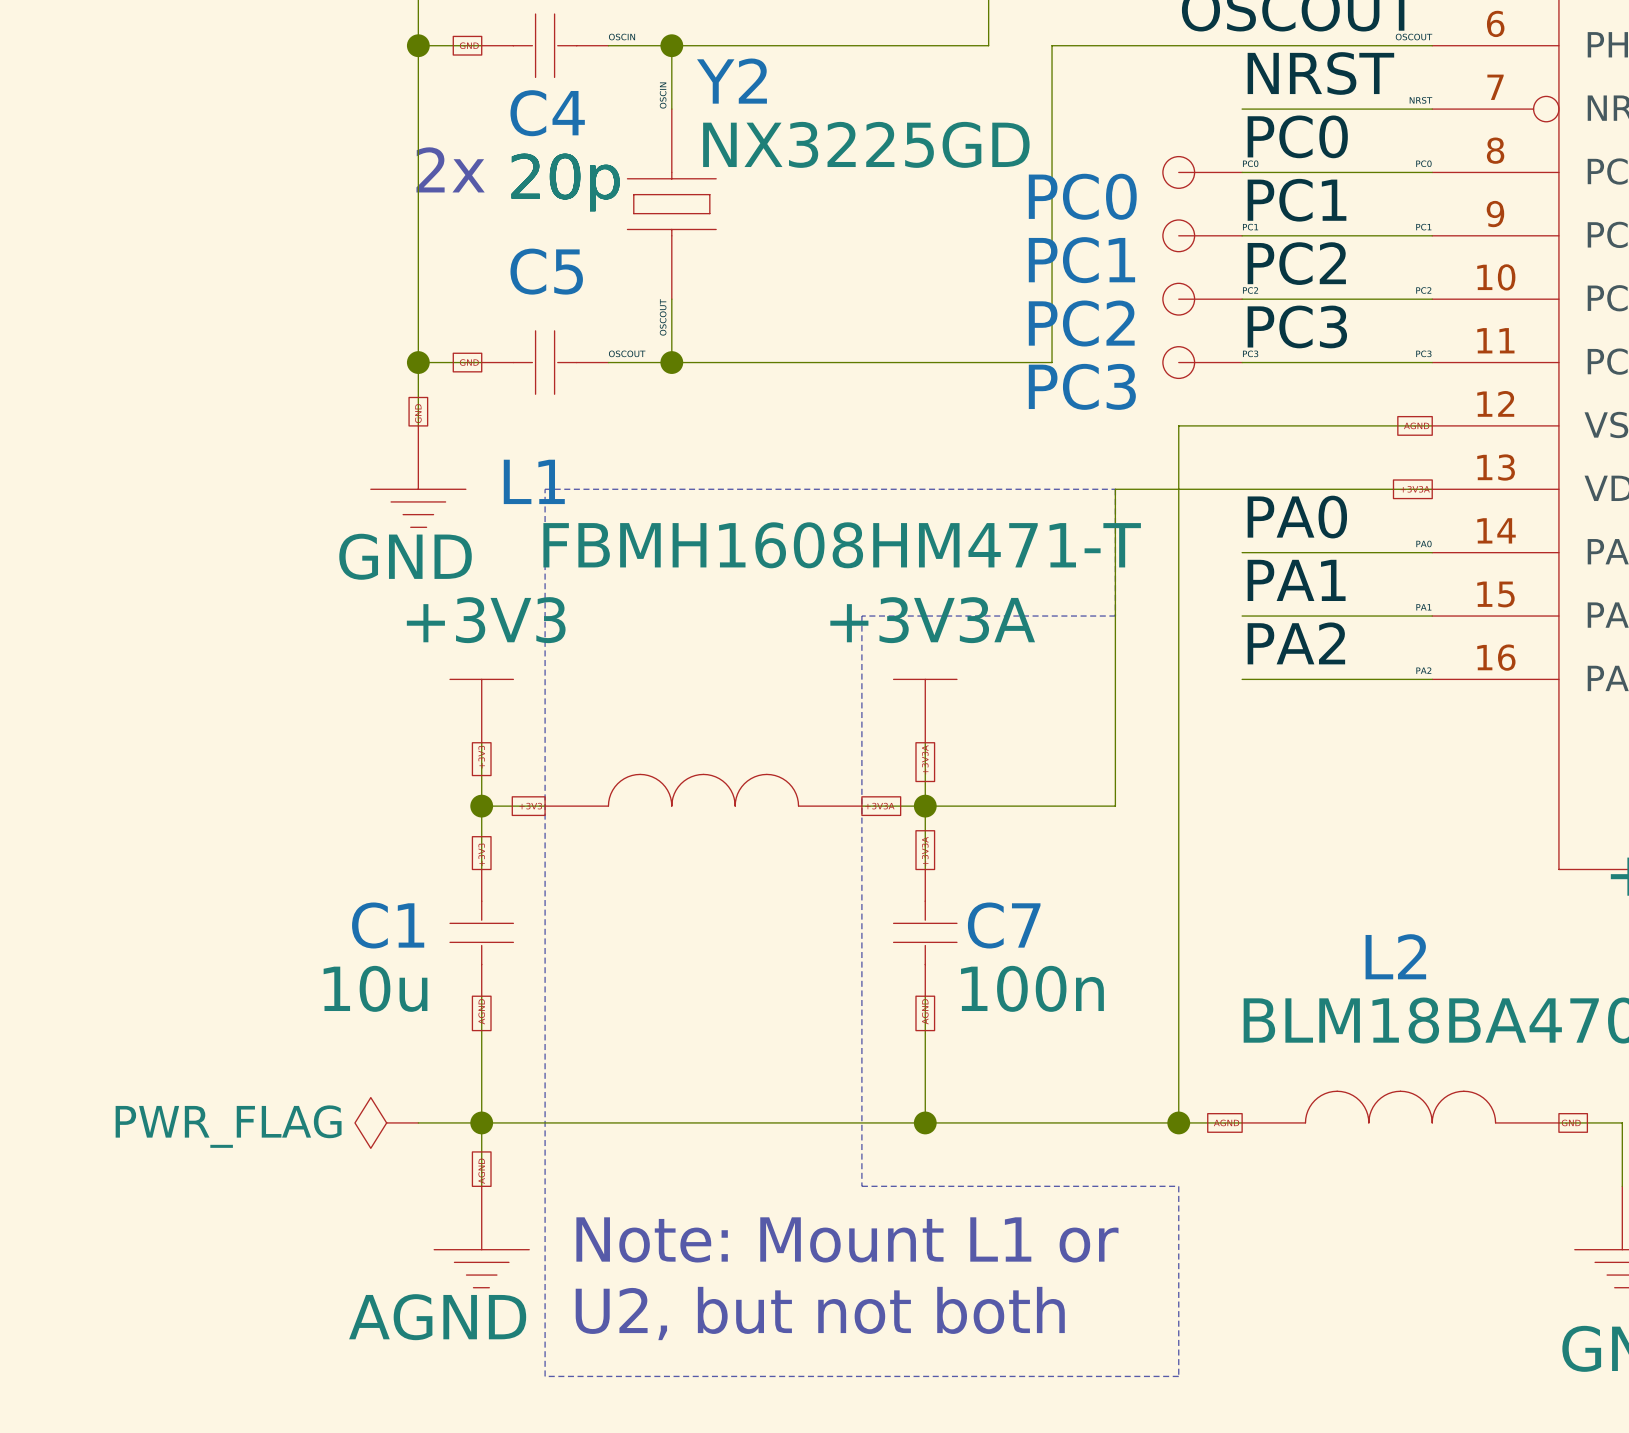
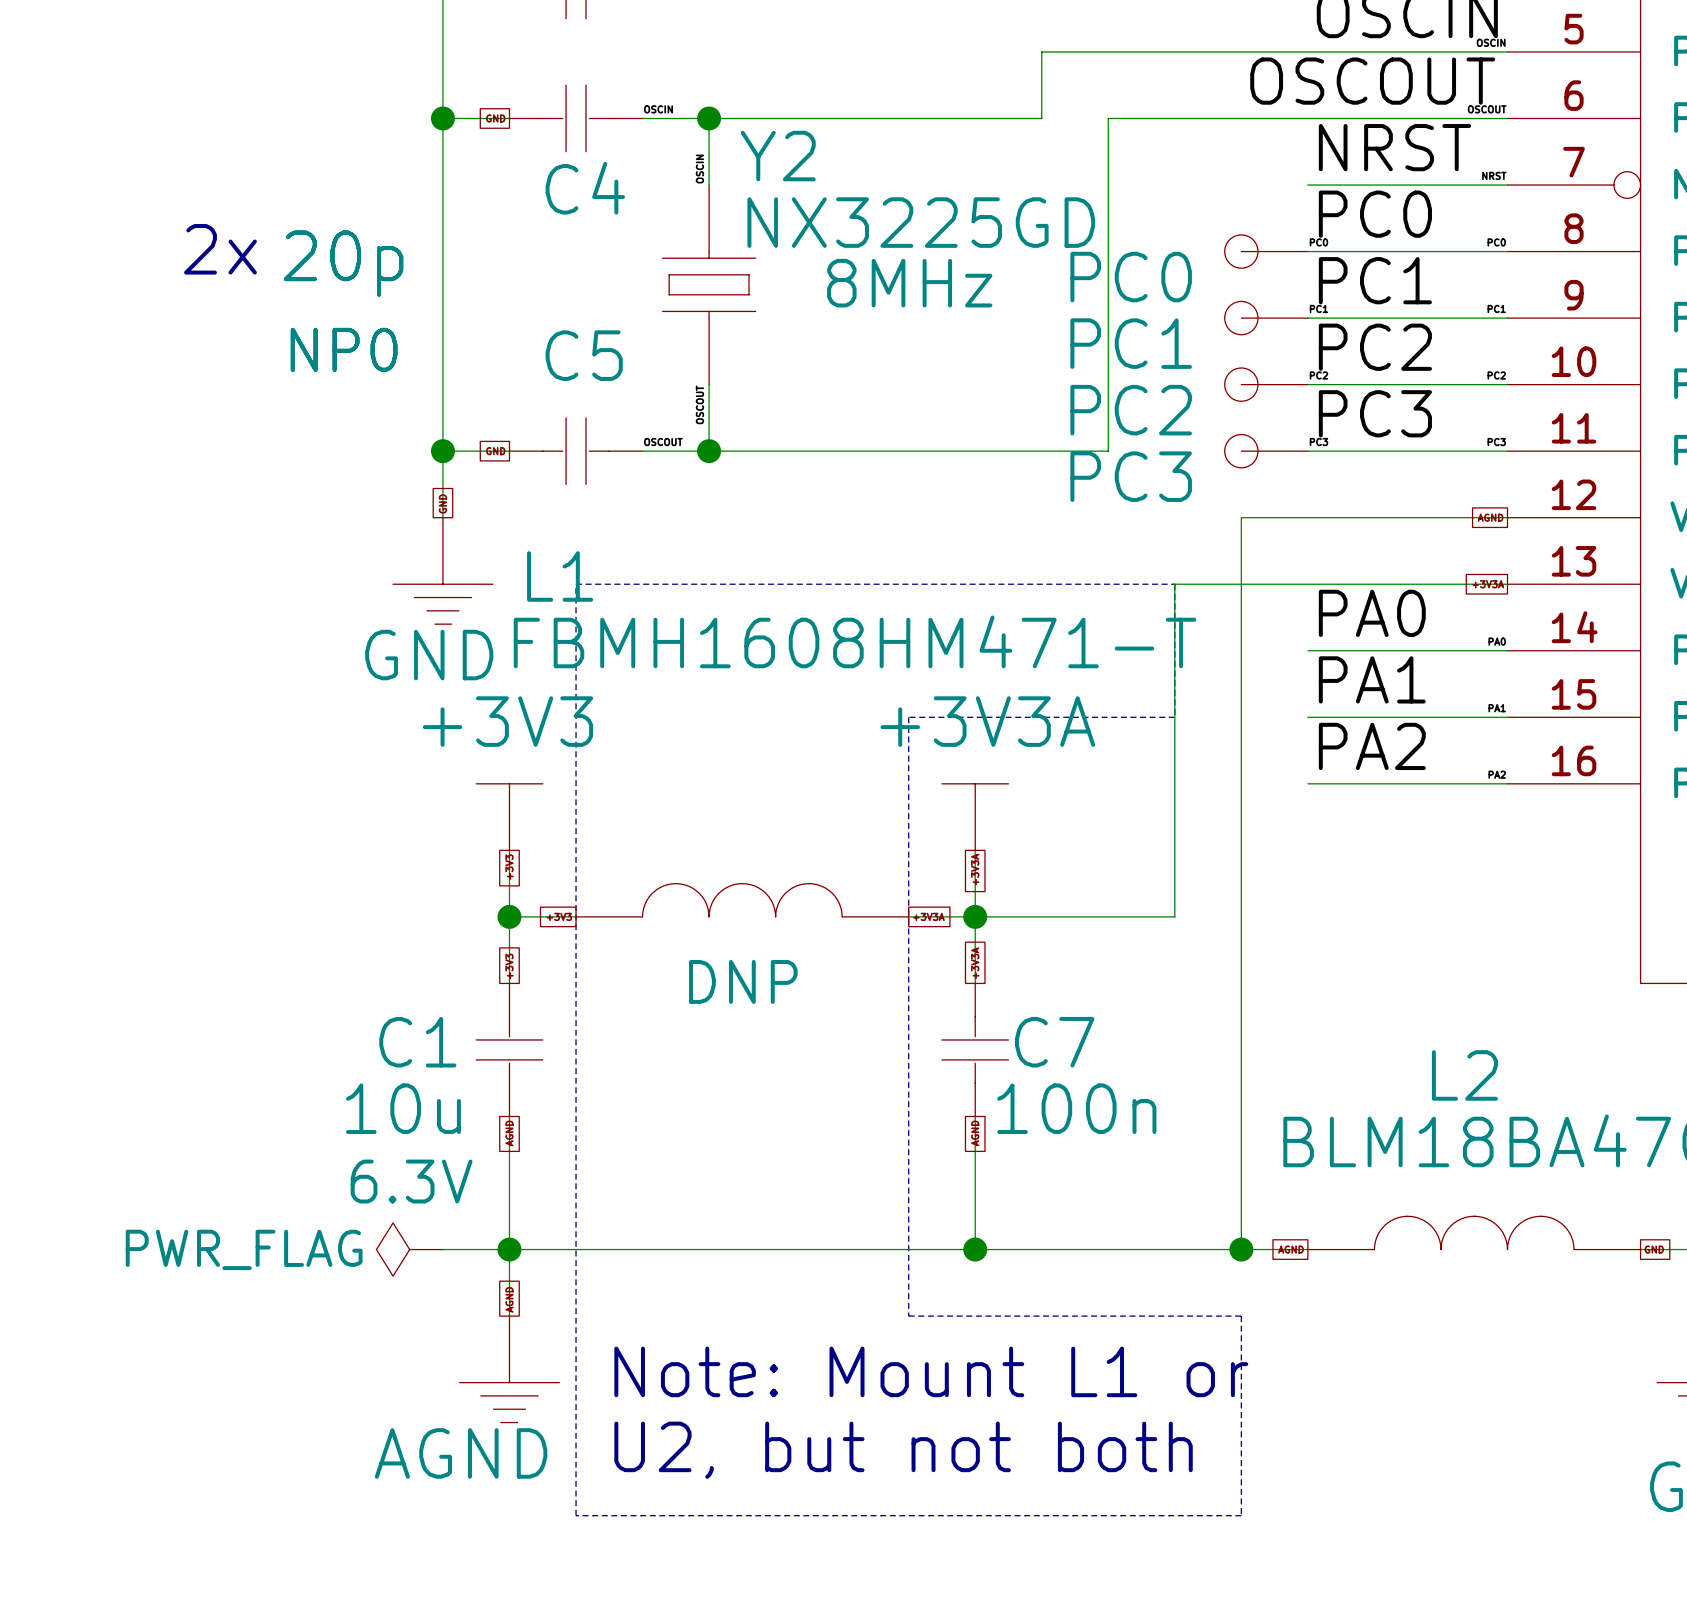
text position: 2x (450, 169) -> 2x (220, 249)
C4 value position: 20p (565, 182) -> 20p (343, 263)
C5 value position: 20p (565, 182) -> 20p (343, 263)
Y2 text: none -> 8MHz (909, 283)
C4 text: none -> NP0 (344, 349)
C5 text: none -> NP0 (344, 349)
L1 text: none -> DNP (743, 981)
C1 text: none -> 6.3V (411, 1181)

